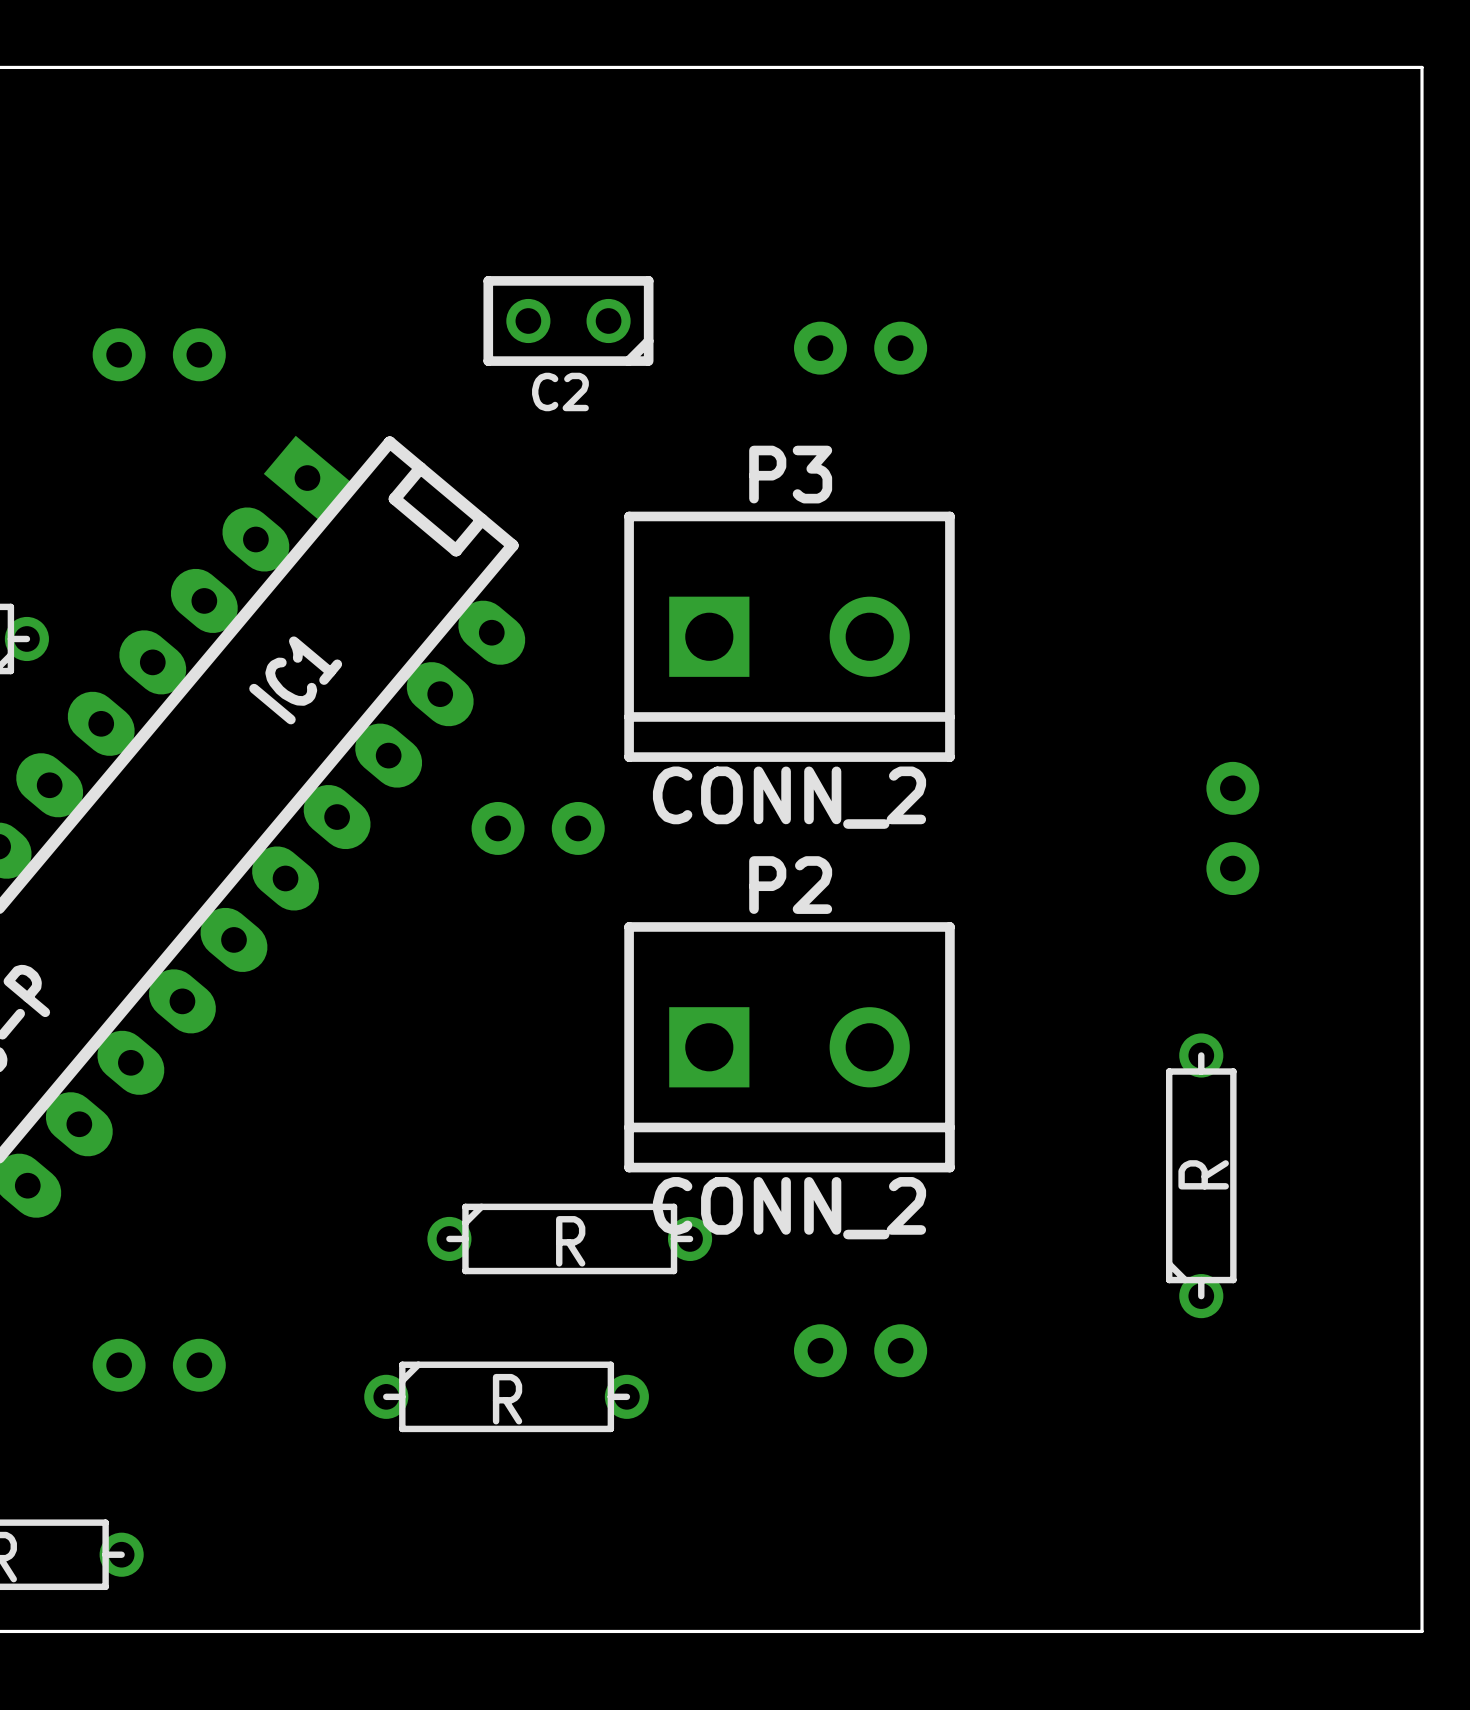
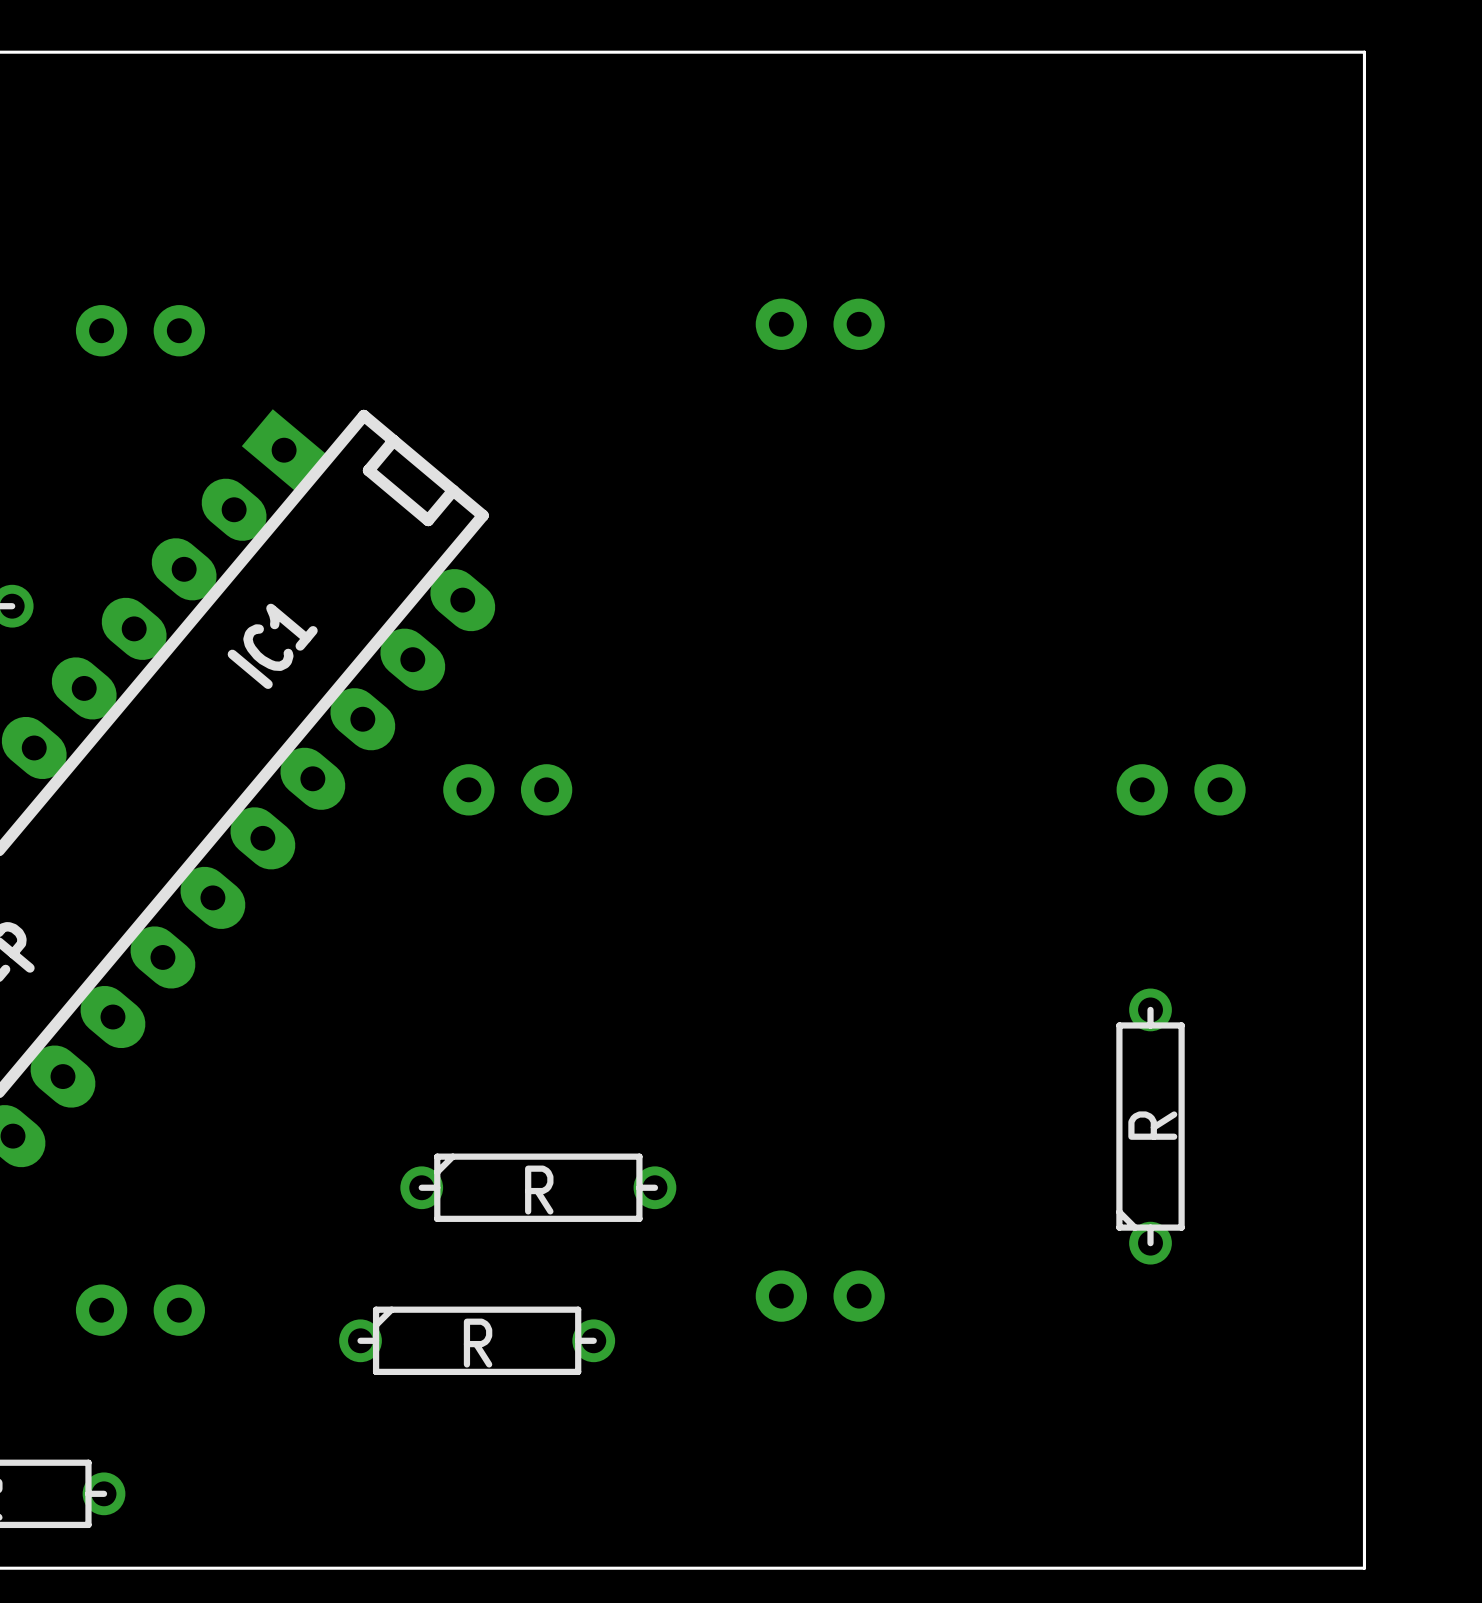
C2: (568, 321) -> none
P3: CONN_2 (789, 636) -> none
part rotation: 0° (1232, 828) -> 90° clockwise (1181, 789)
P2: CONN_2 (789, 1047) -> none

